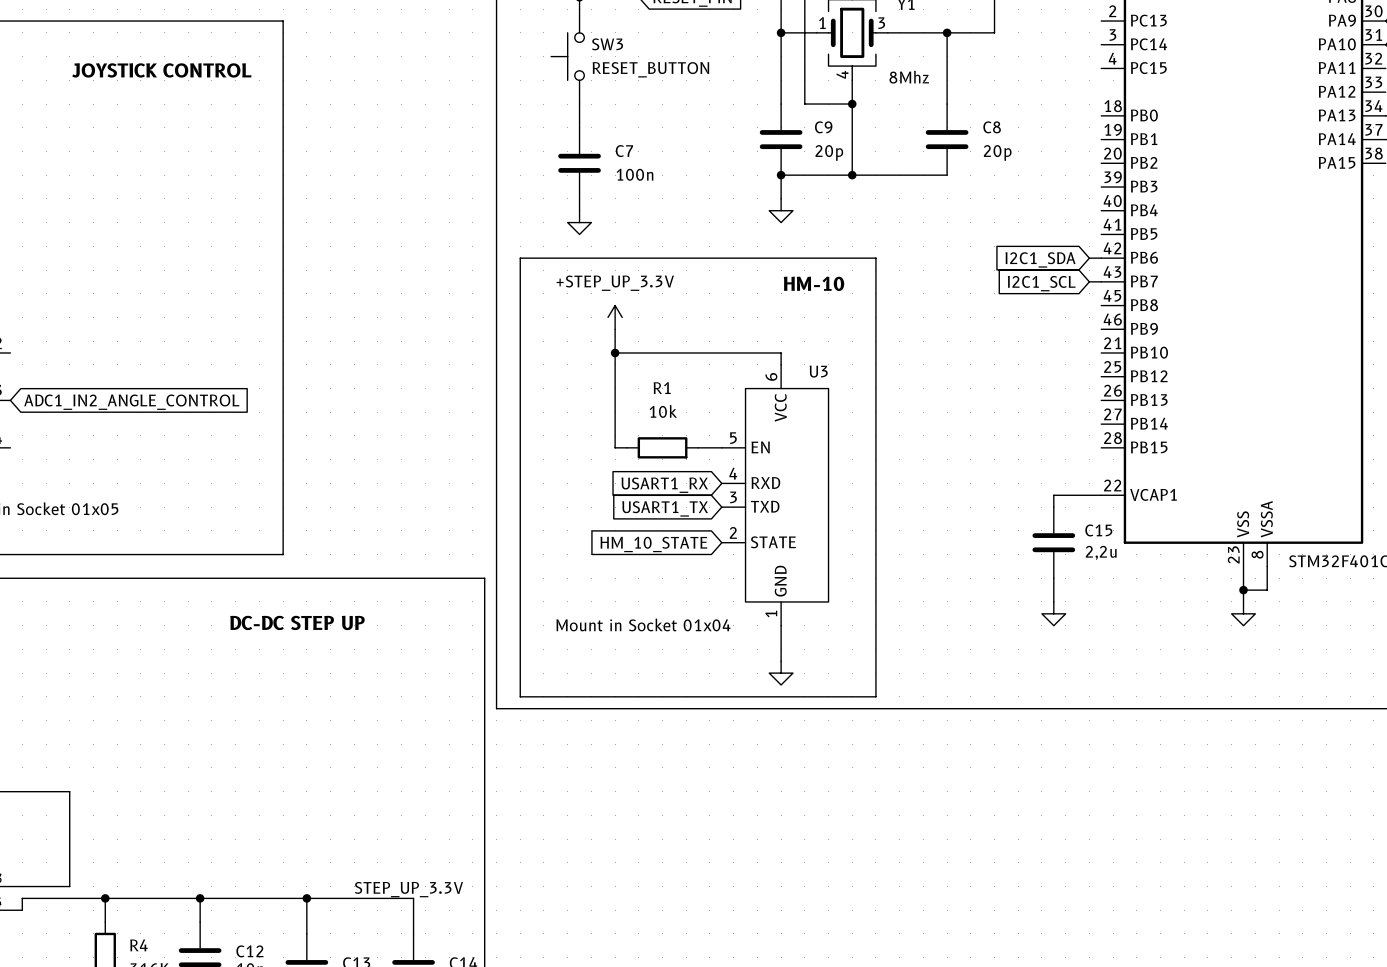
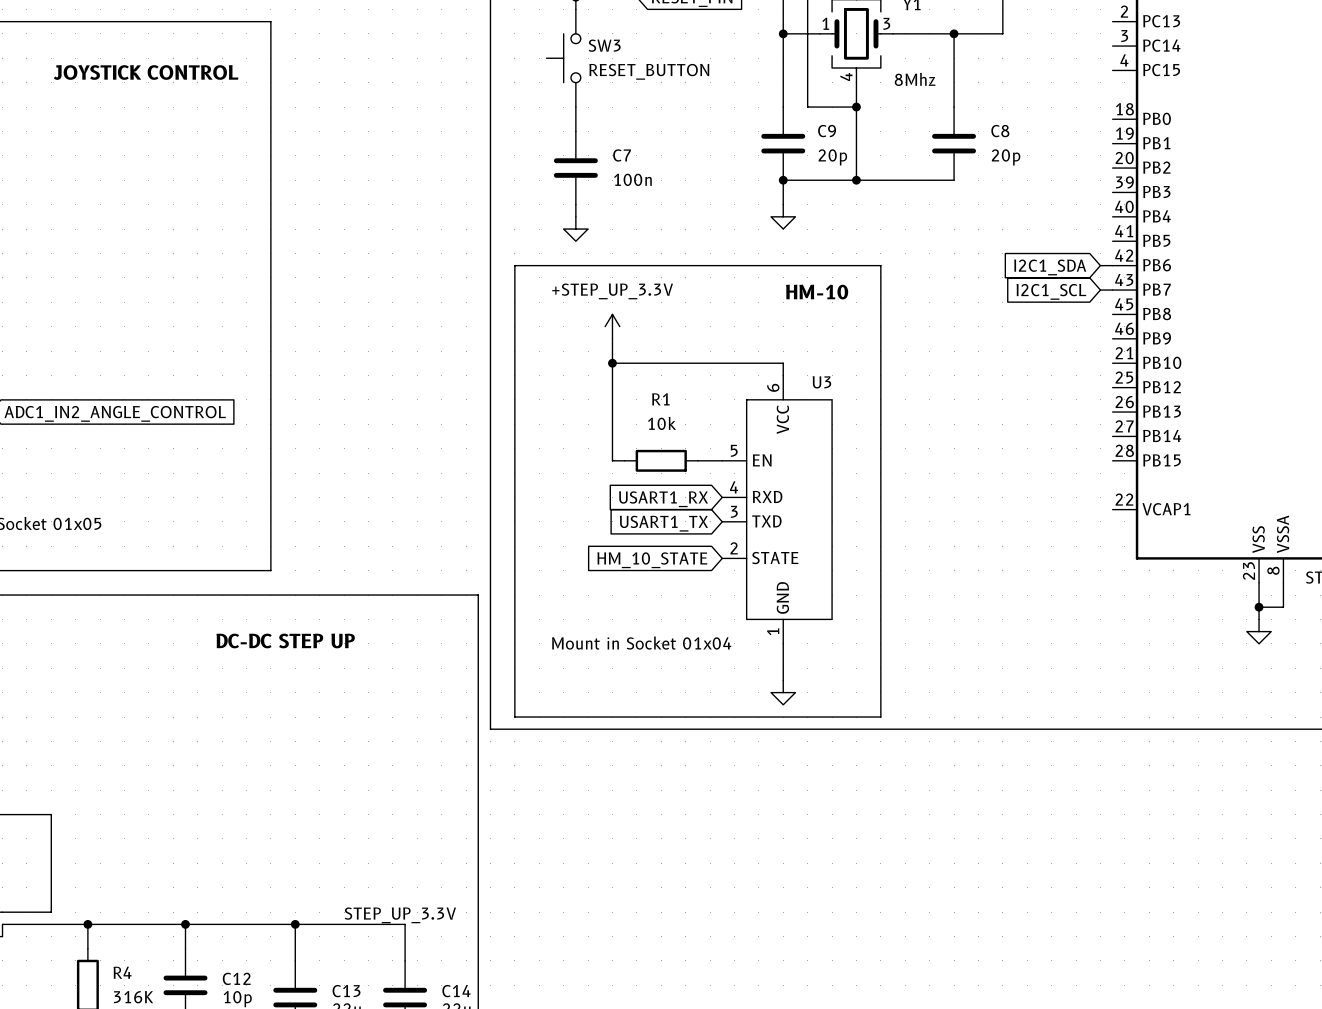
wire: (1101, 495) (1053, 495) (1053, 507) -> none
C15: 2,2u (1053, 542) -> none
wire: (1053, 578) (1053, 601) -> none
power symbol: (1053, 613) -> none

